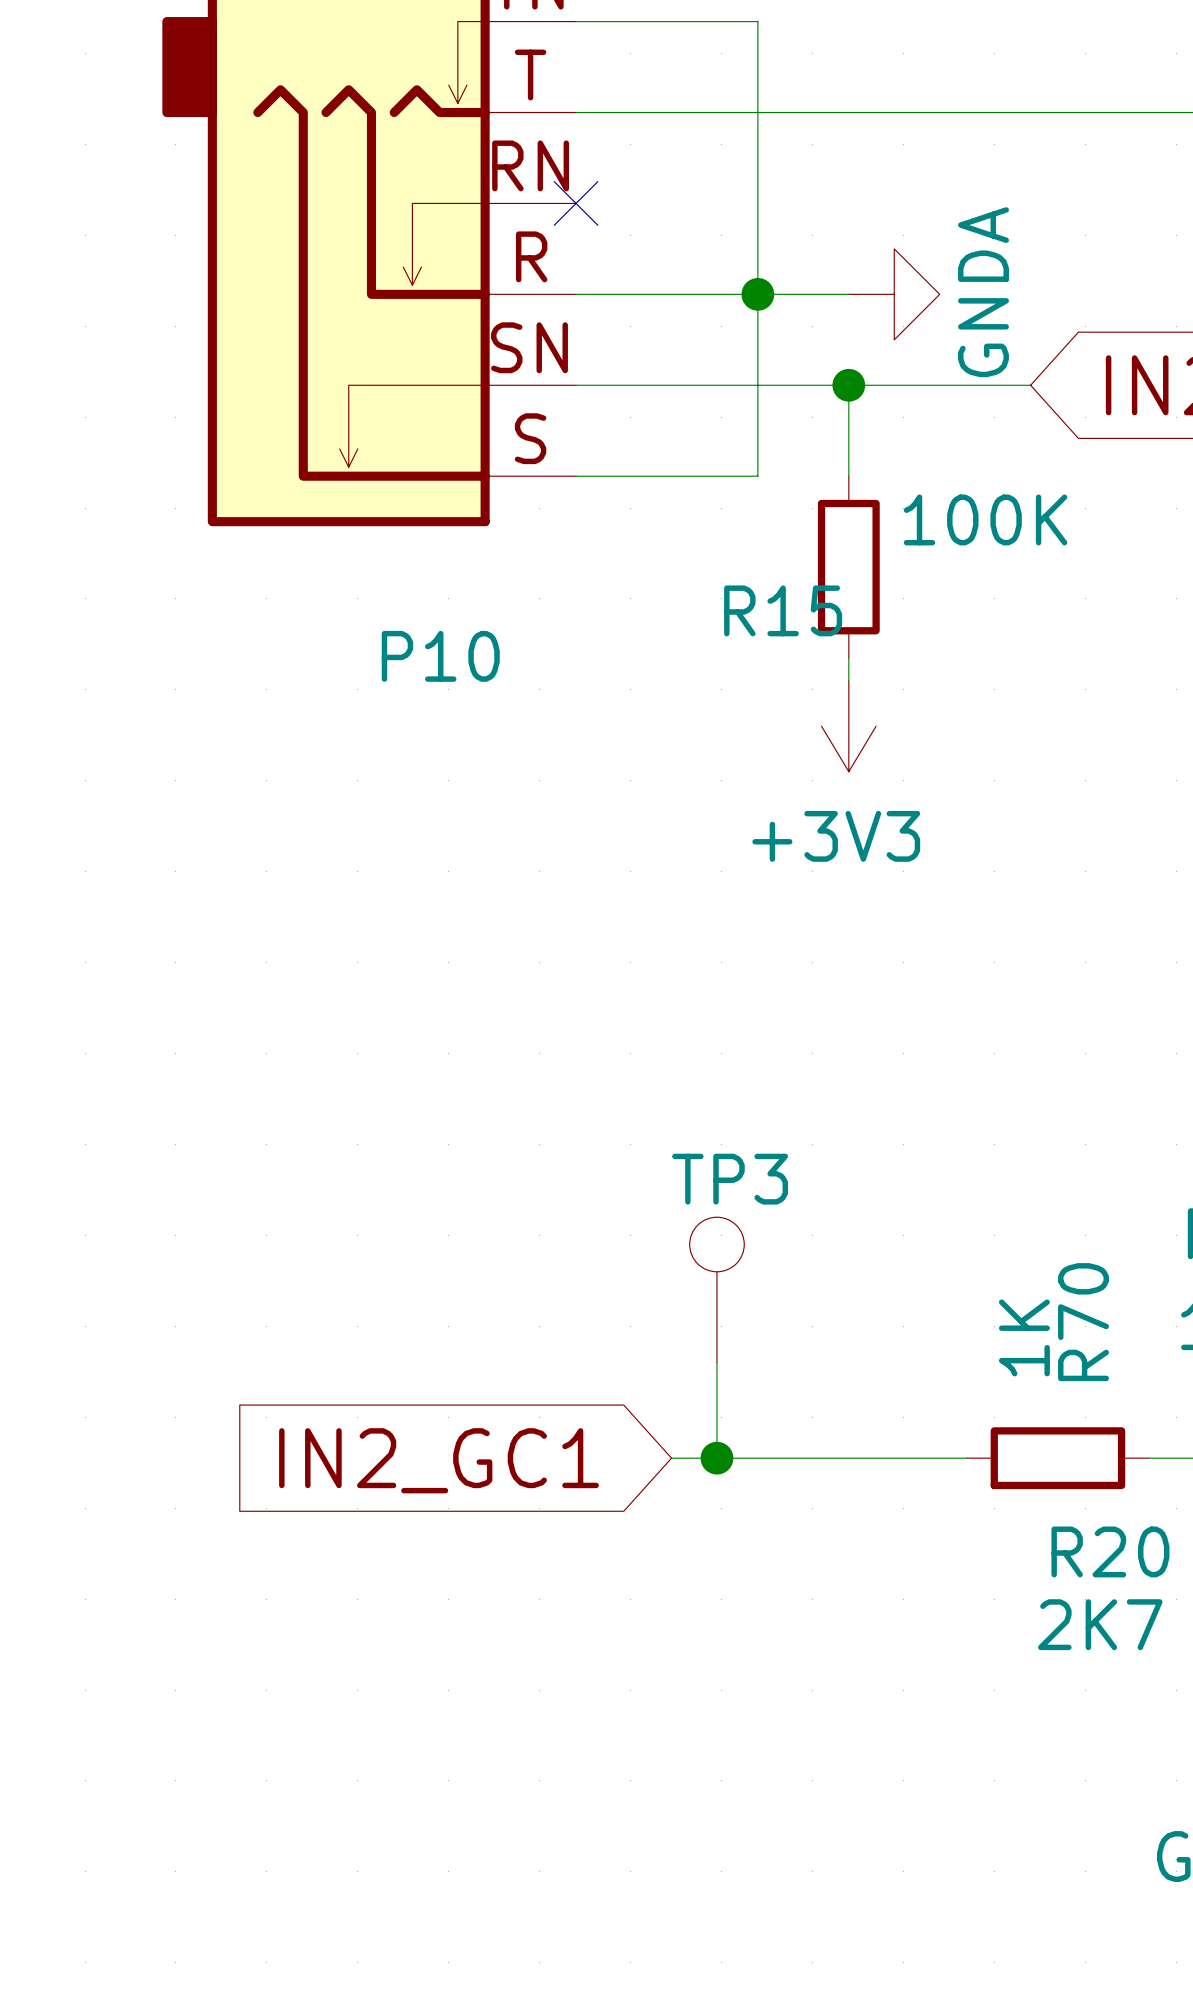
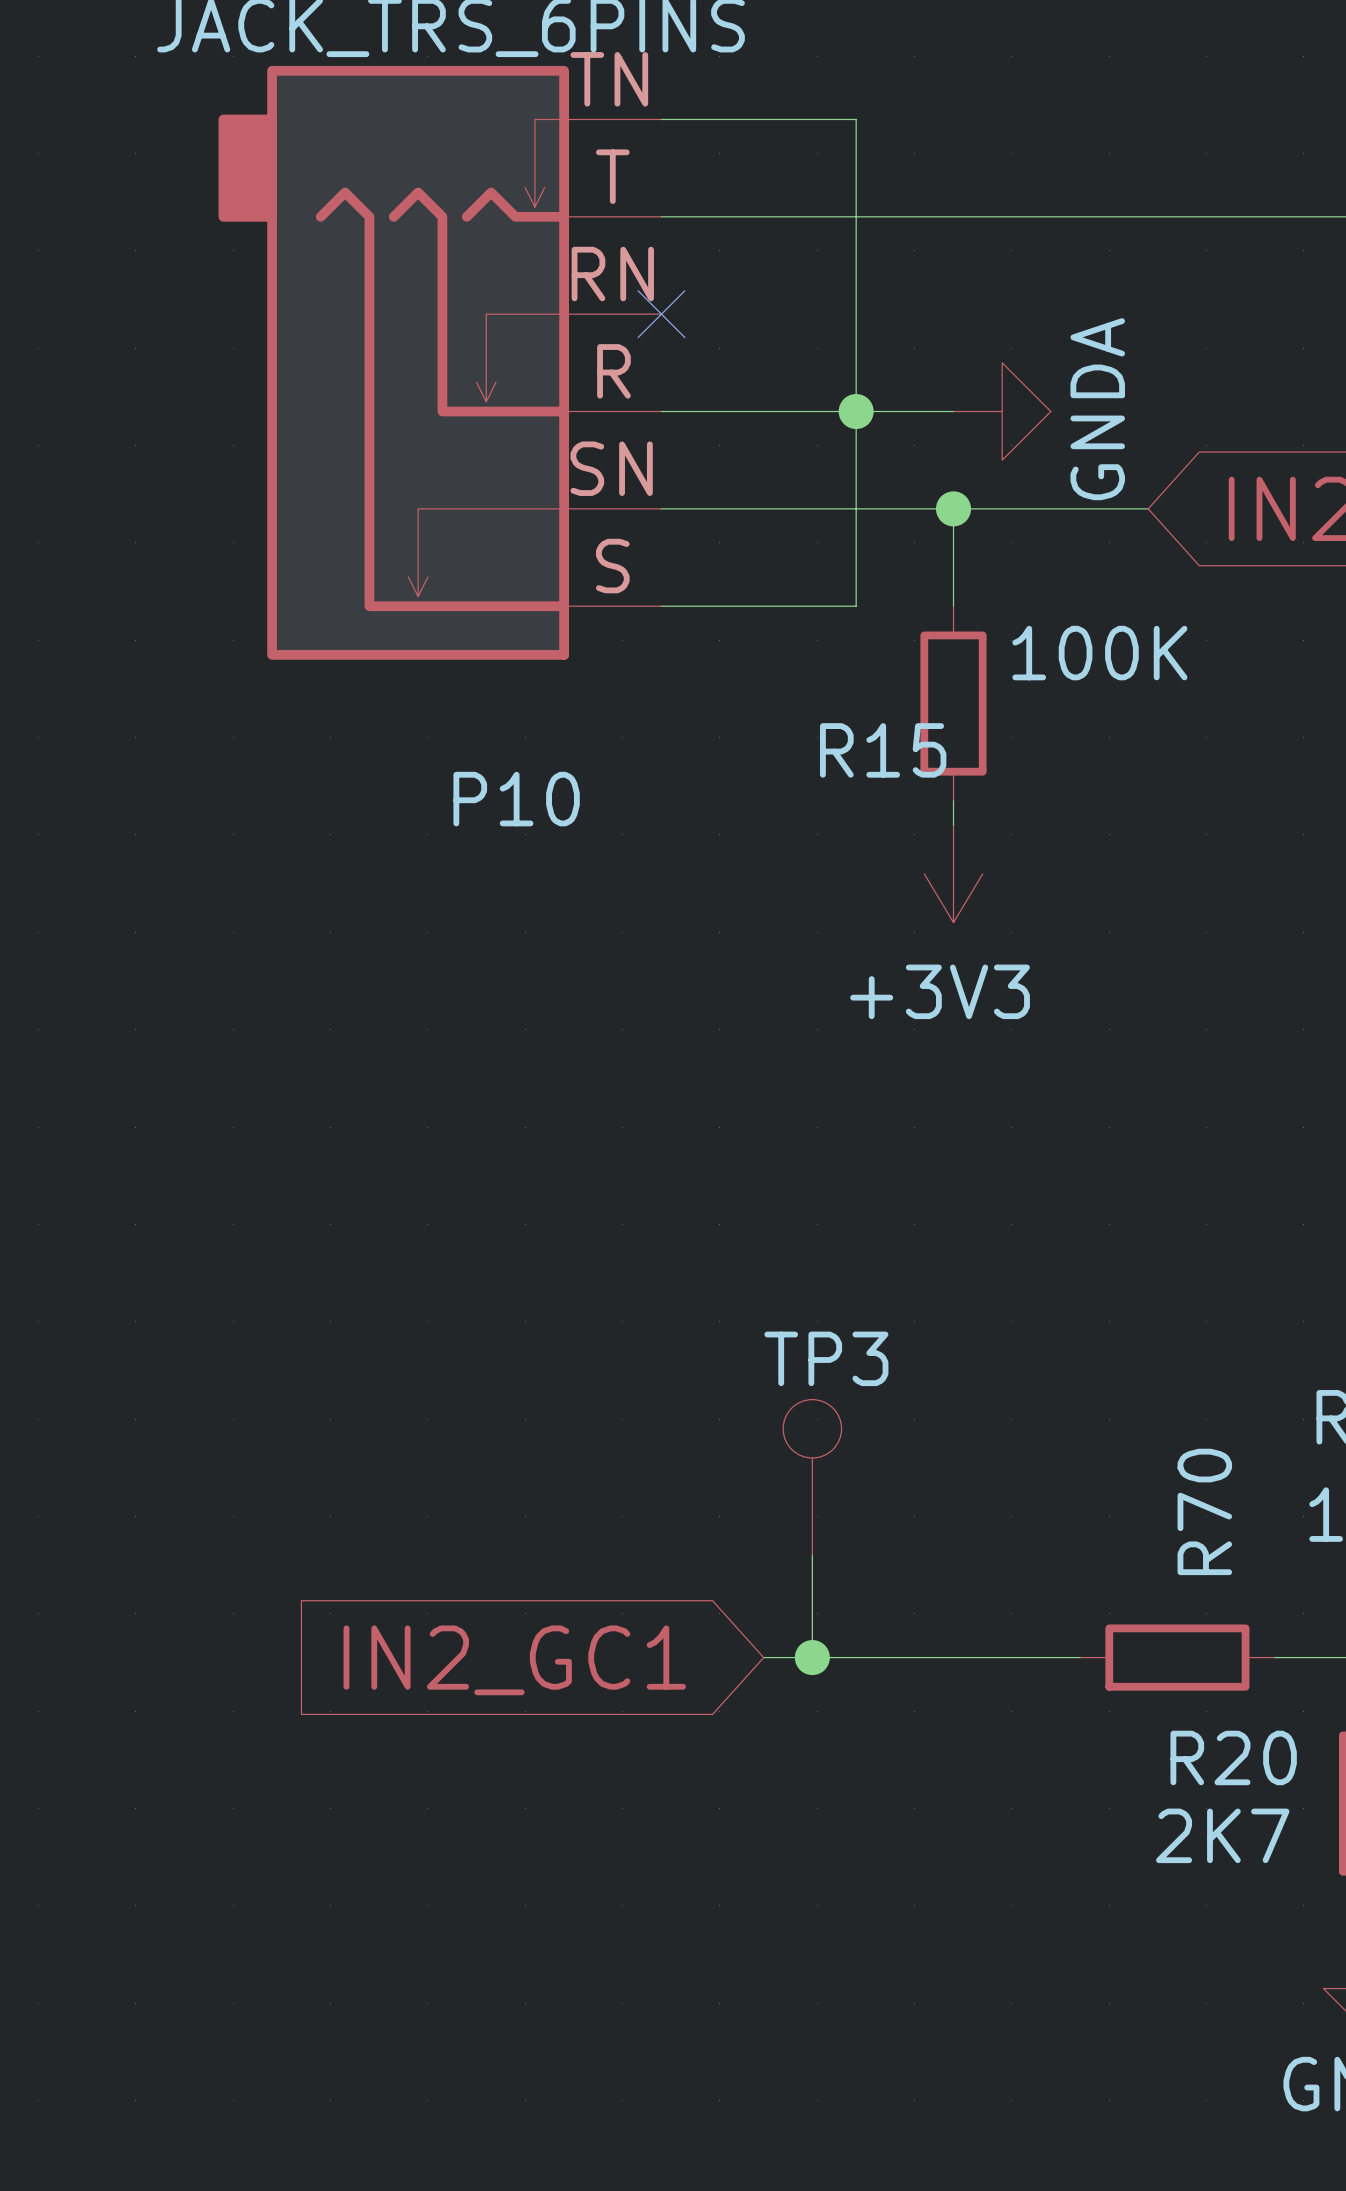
R70 value: 1K (1024, 1337) -> none

